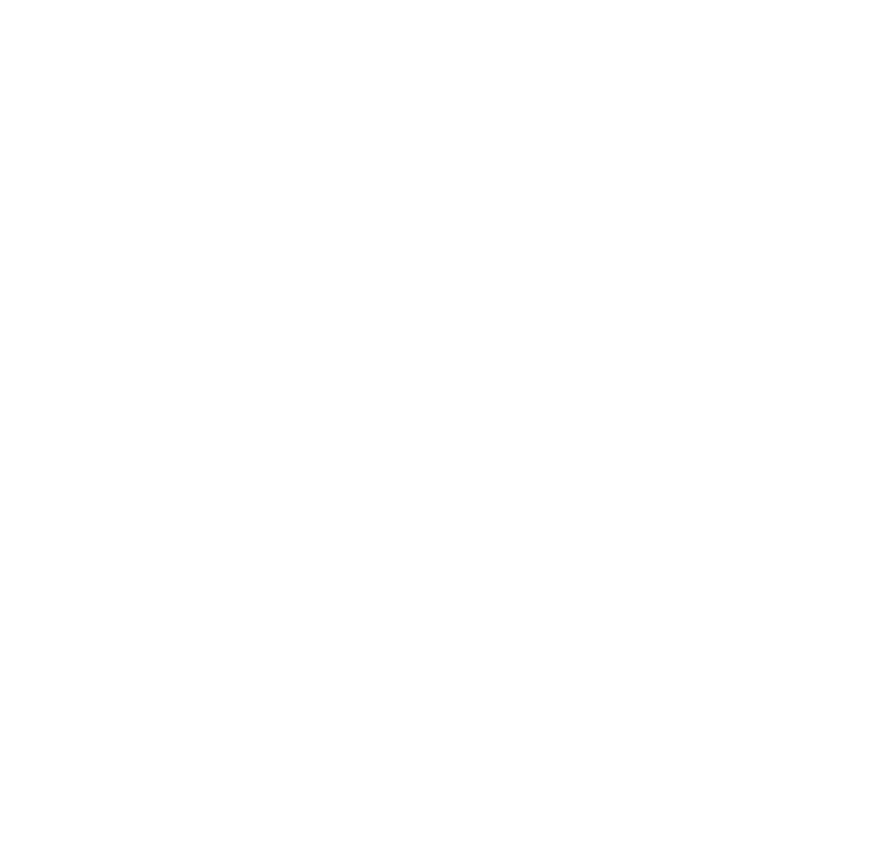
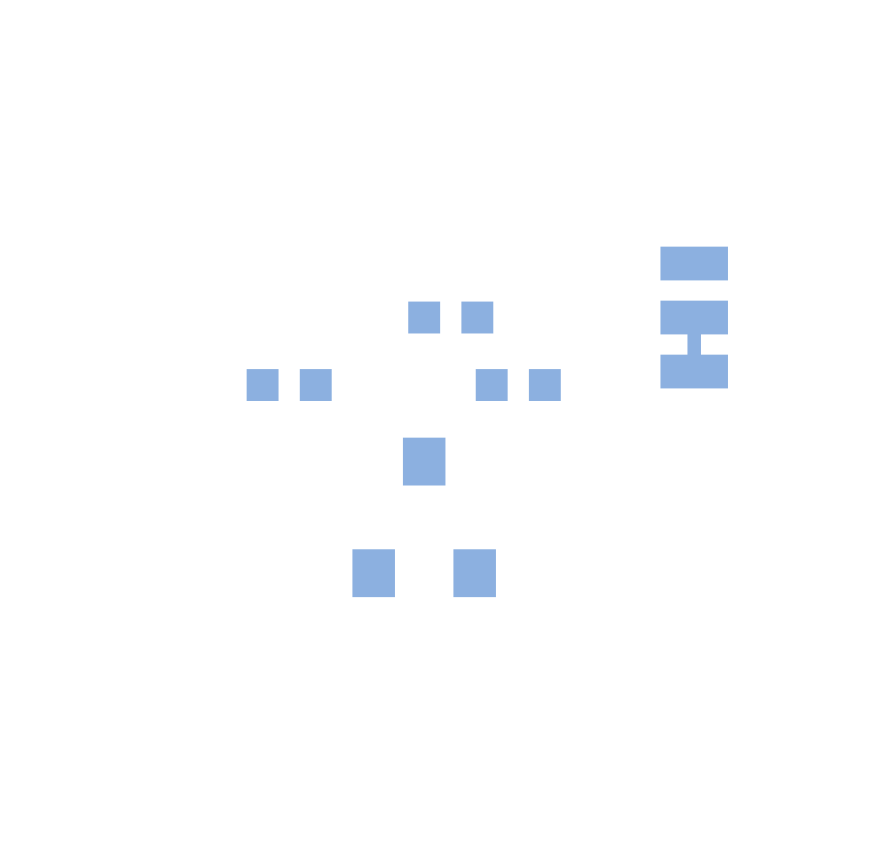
part: none -> (450, 317)
part: none -> (694, 317)
part: none -> (289, 385)
part: none -> (518, 385)
part: none -> (424, 517)

